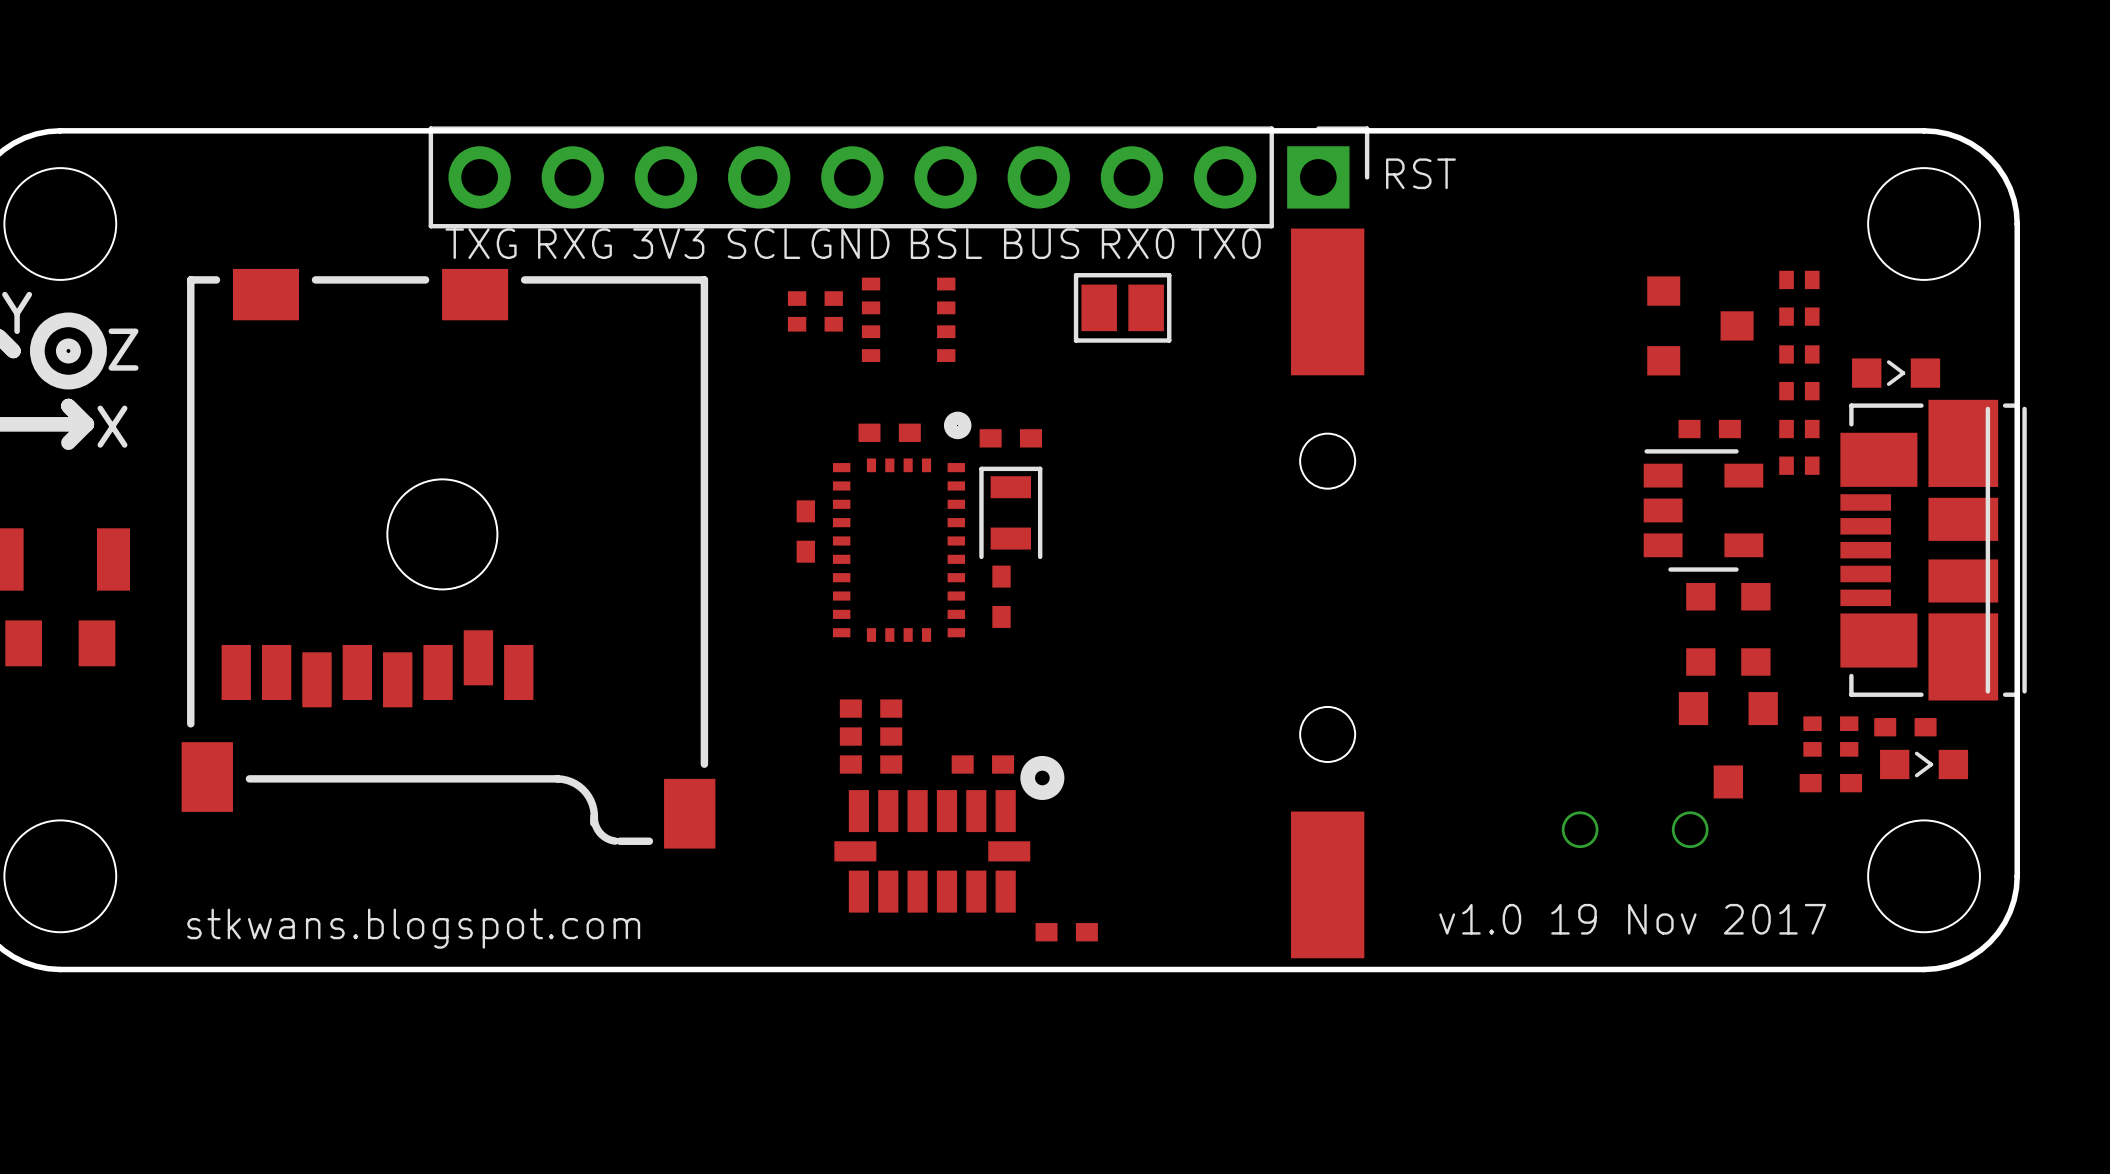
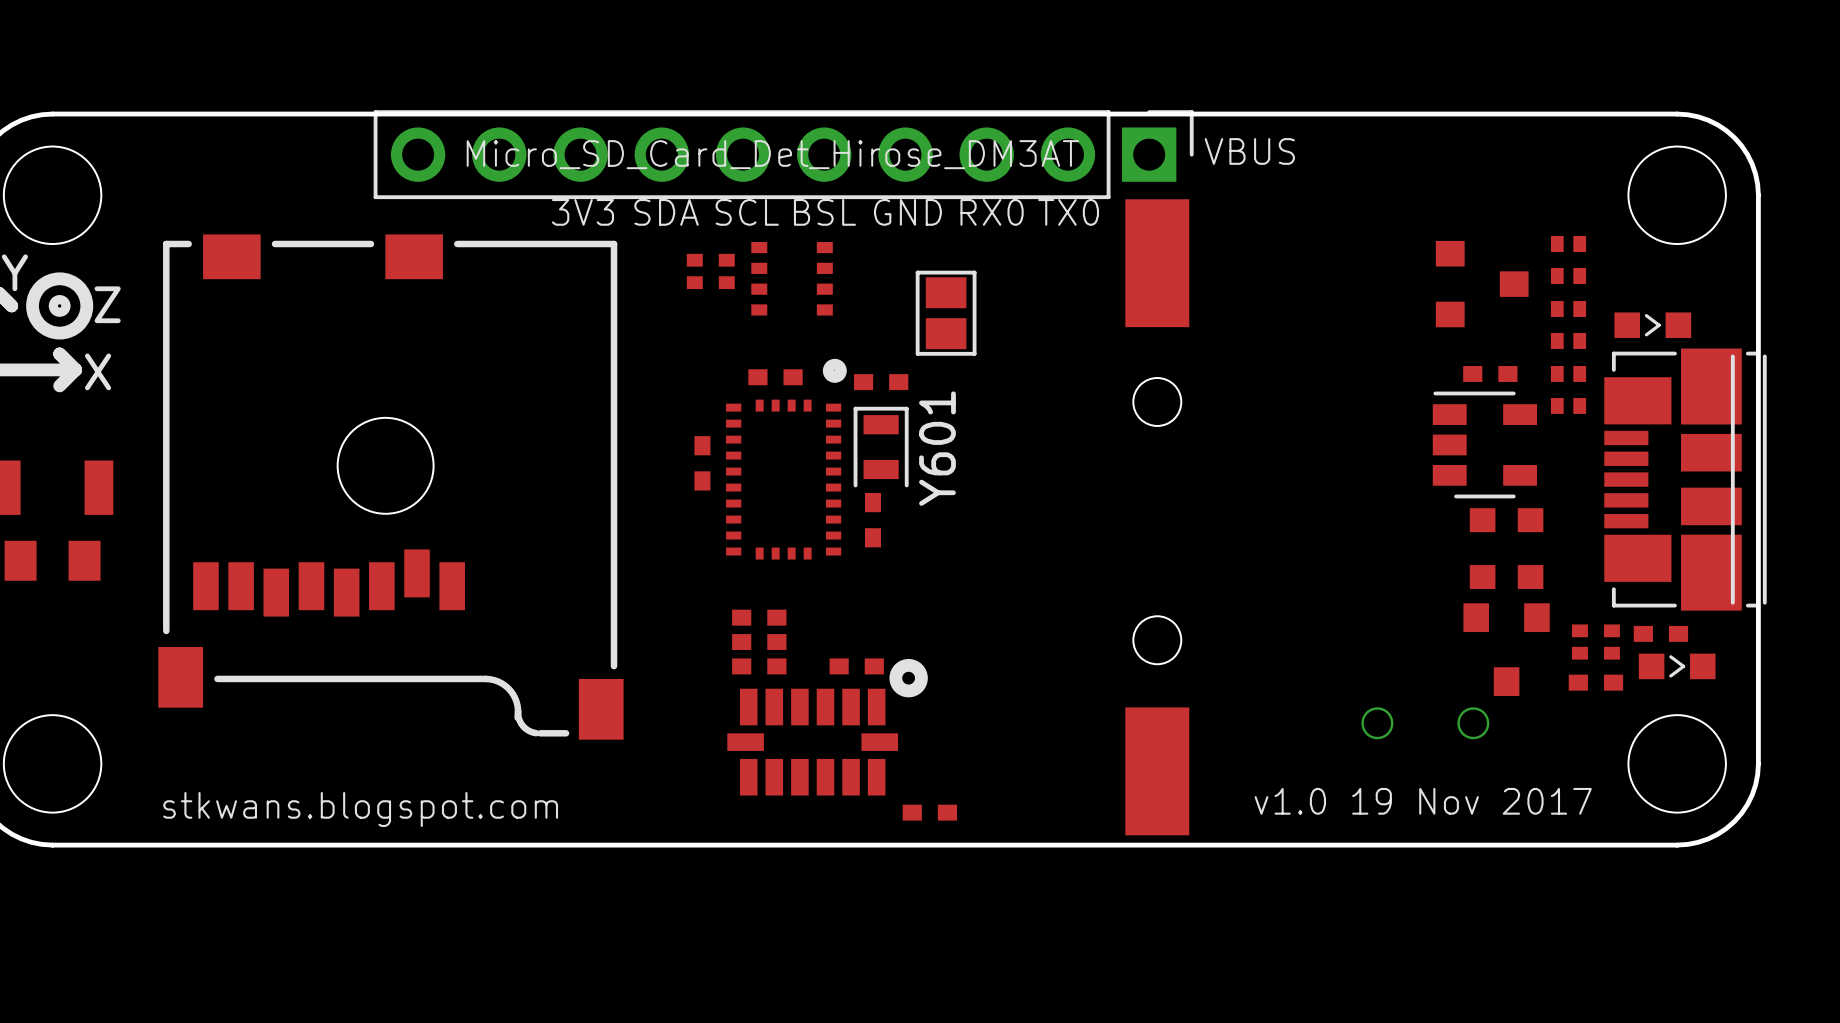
text: RST (1420, 173) -> VBUS (1249, 151)
part value: none -> Micro_SD_Card_Det_Hirose_DM3AT (772, 154)
text: TXG (481, 243) -> none
text: RXG (574, 243) -> none
text: SCL (763, 243) -> SDA (666, 212)
text: GND (850, 243) -> SCL (747, 212)
text: BUS (1041, 243) -> GND (907, 212)
part rotation: 0° (1122, 307) -> 90° clockwise (946, 313)
part position: (1122, 307) -> (946, 313)
Y601 name: none -> Y601 (937, 448)

